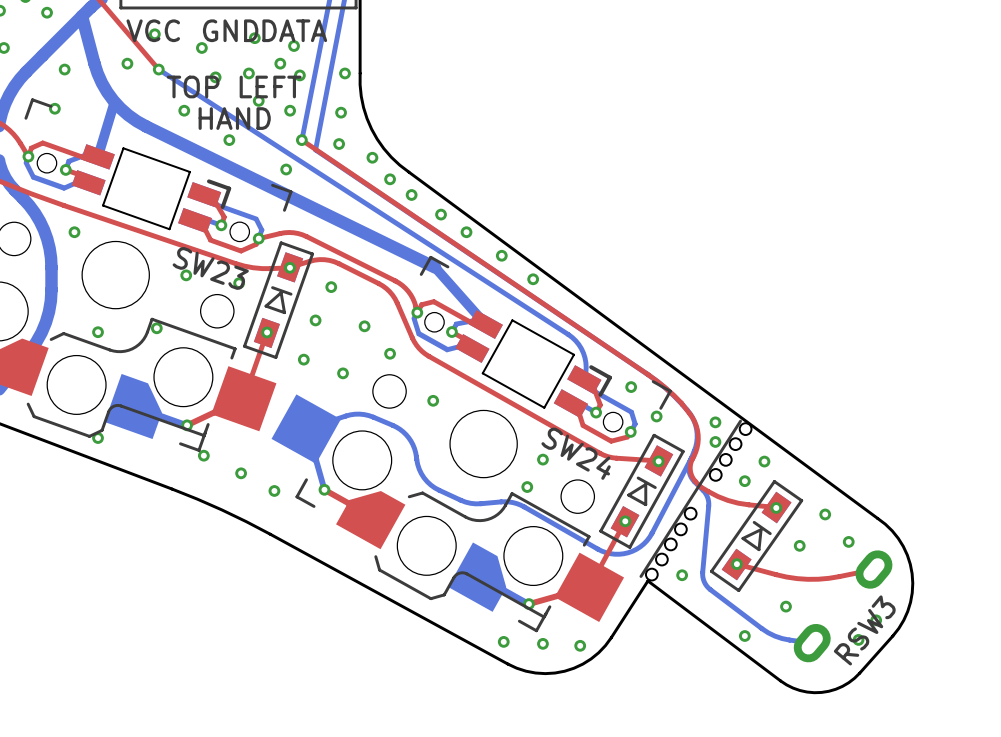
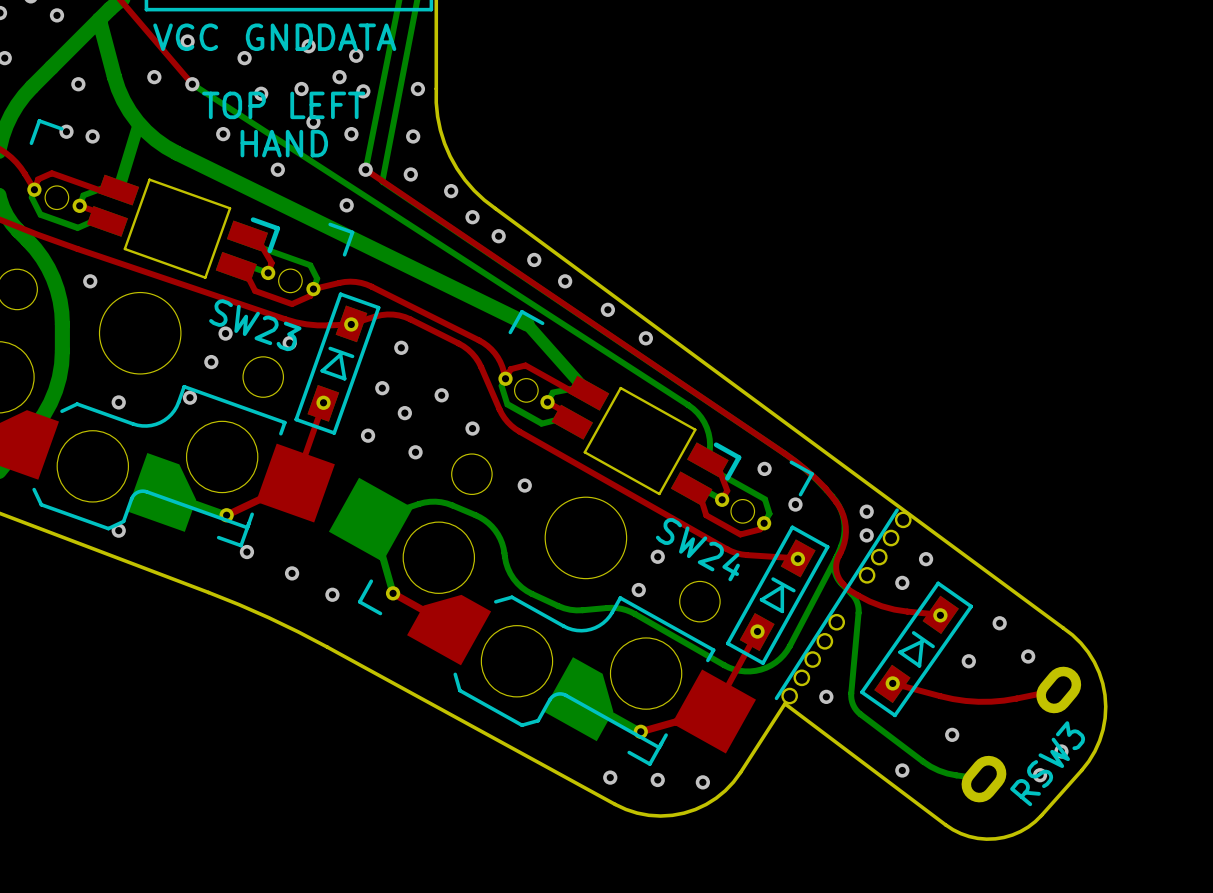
via: none -> (92, 136)
via: none -> (211, 362)
via: none -> (404, 413)

